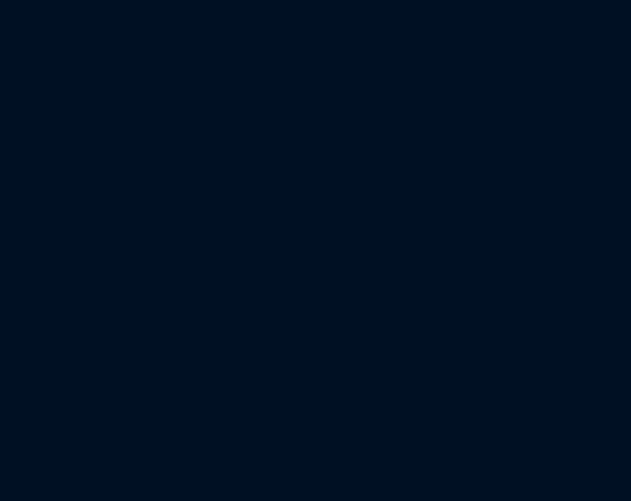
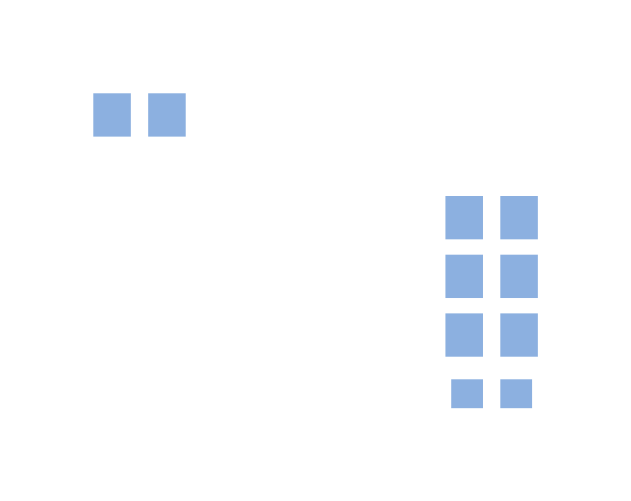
part: none -> (139, 114)
part: none -> (491, 217)
part: none -> (491, 276)
part: none -> (491, 335)
part: none -> (491, 393)

